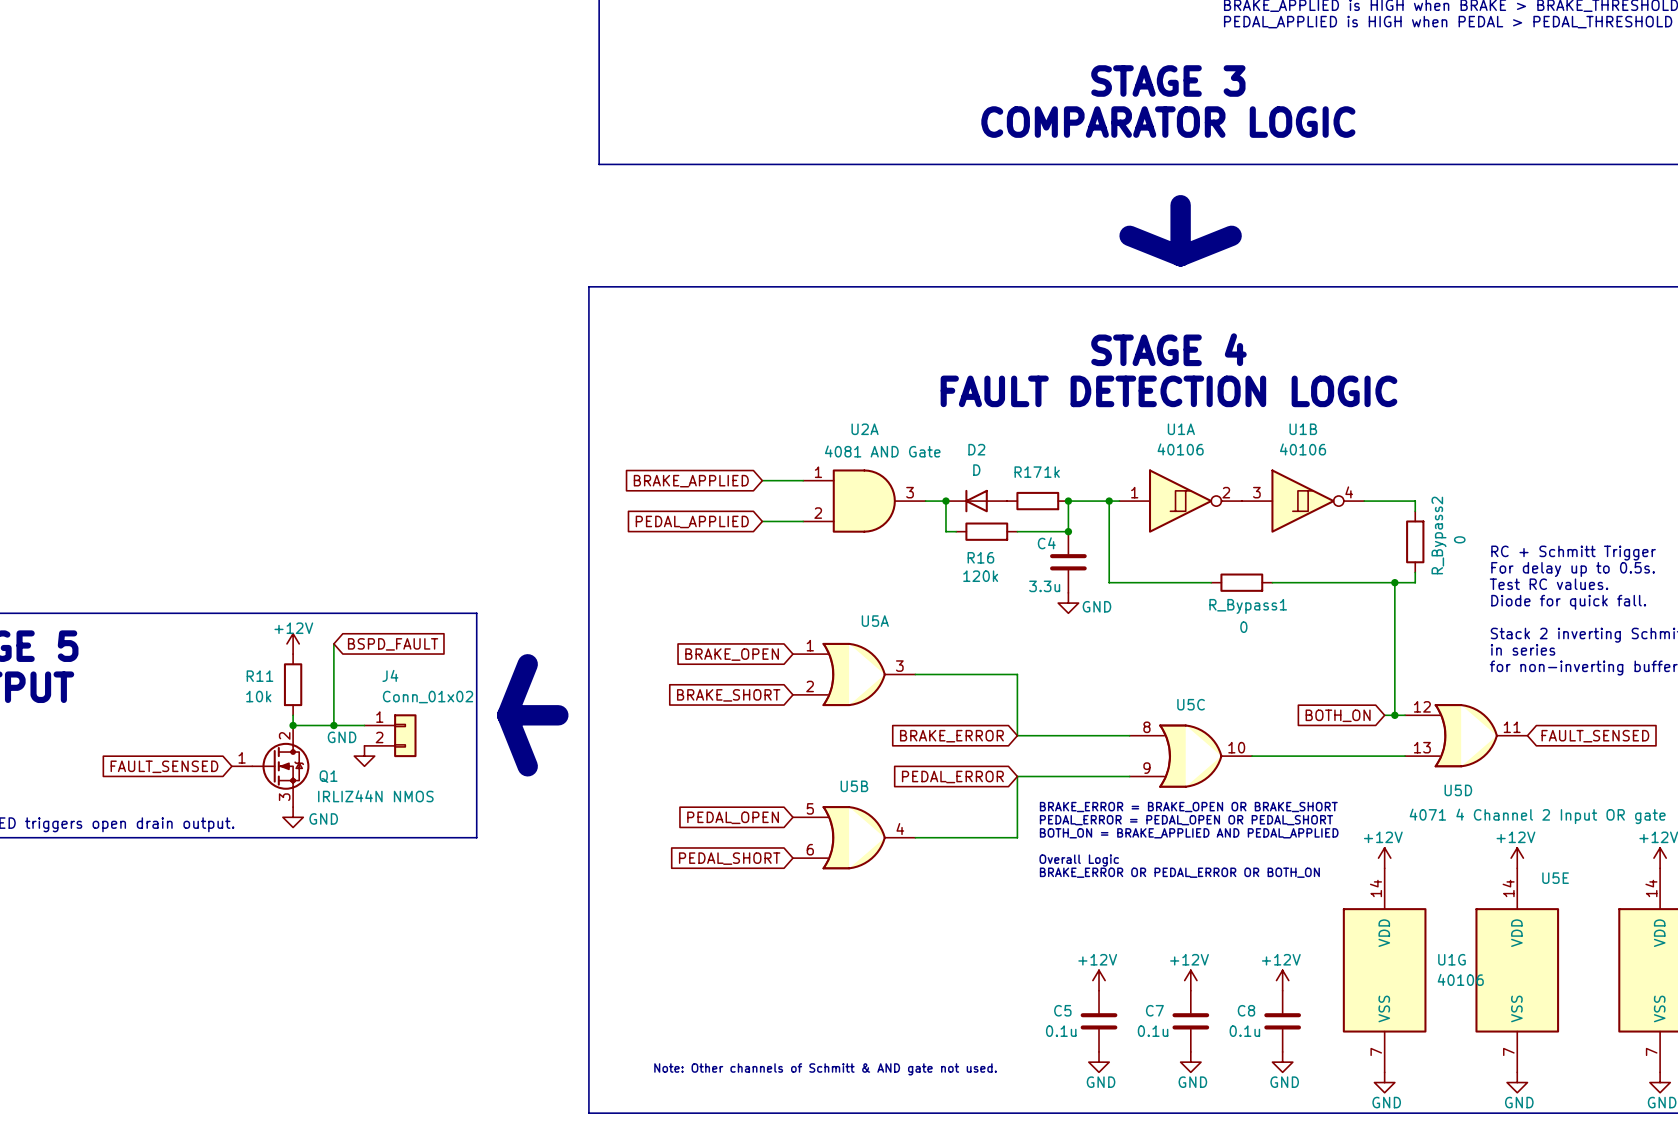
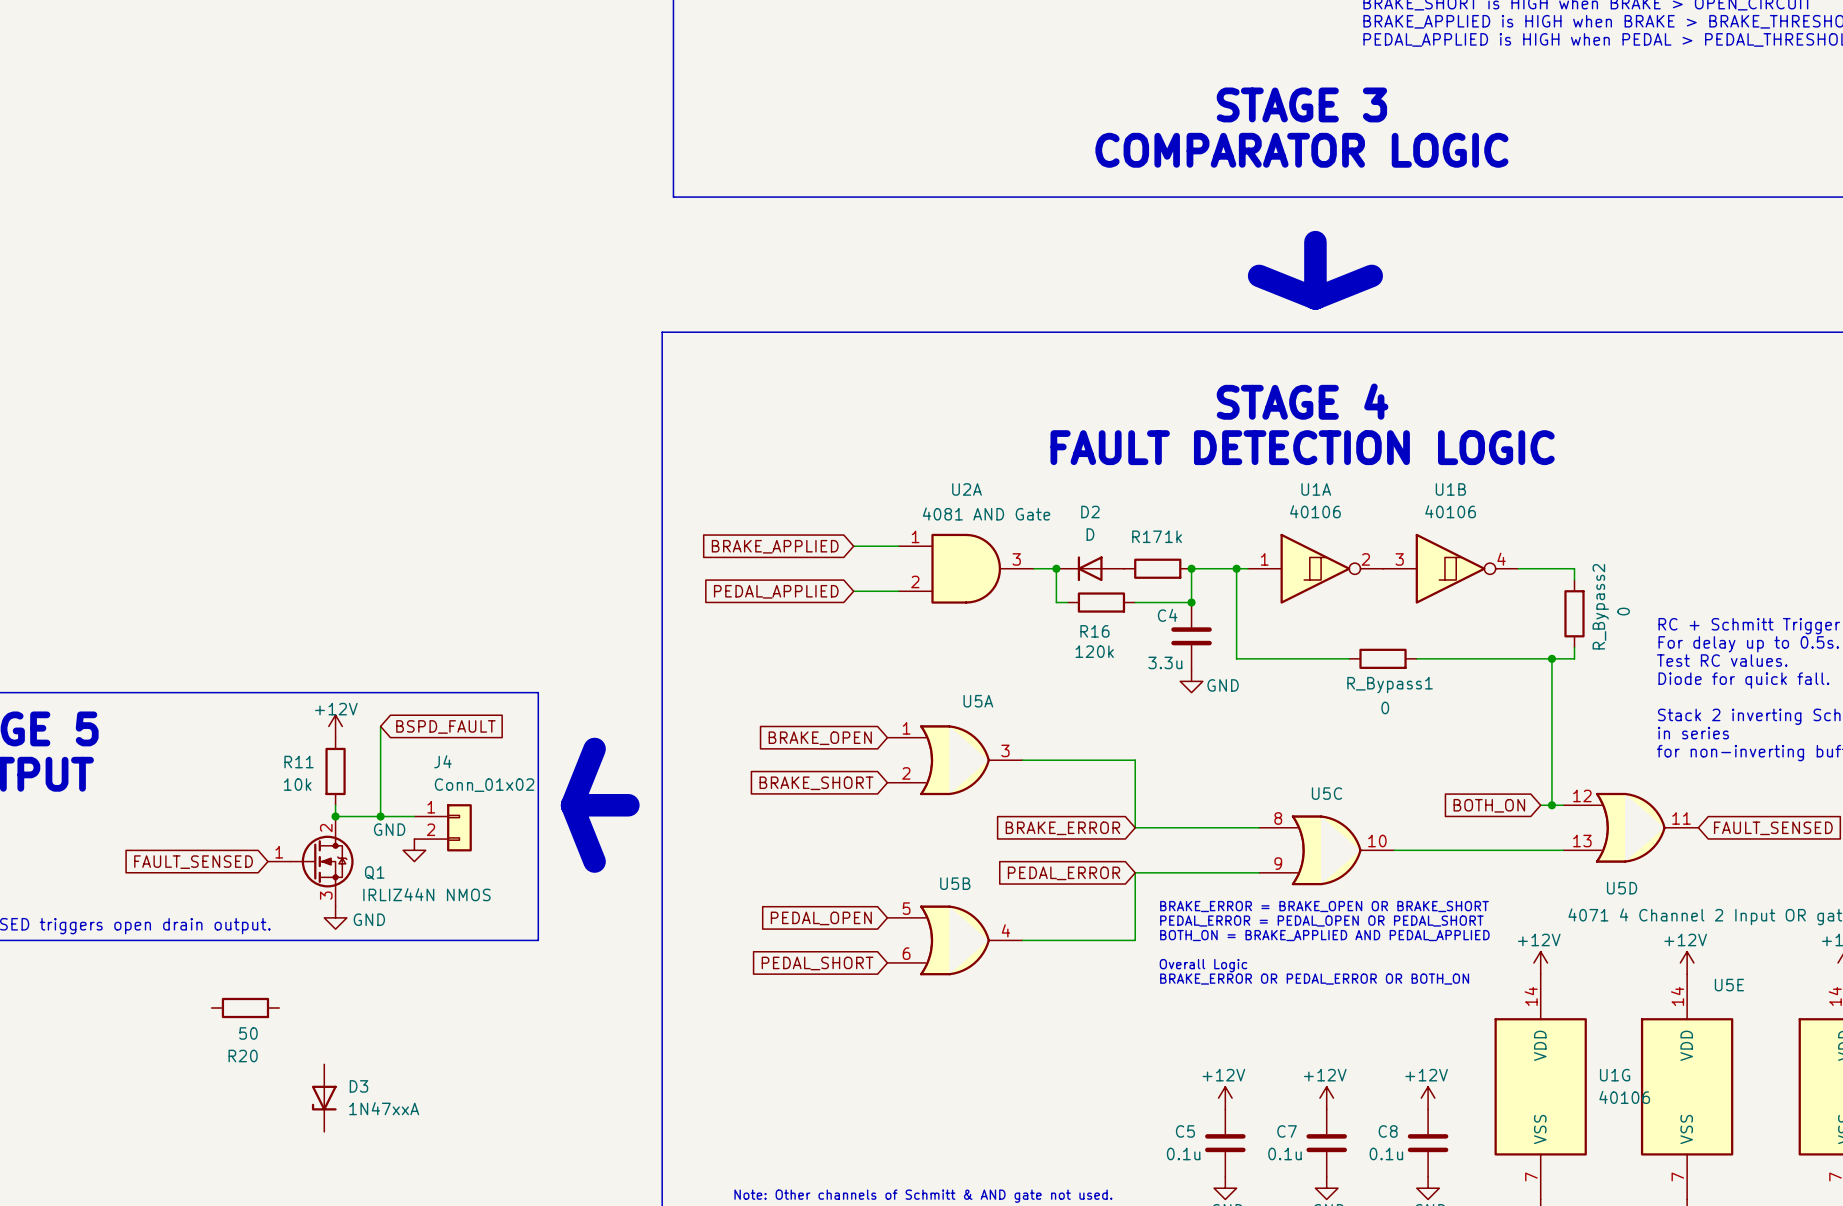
R20: none -> 50 (245, 1007)
D3: none -> 1N47xxA (324, 1098)

